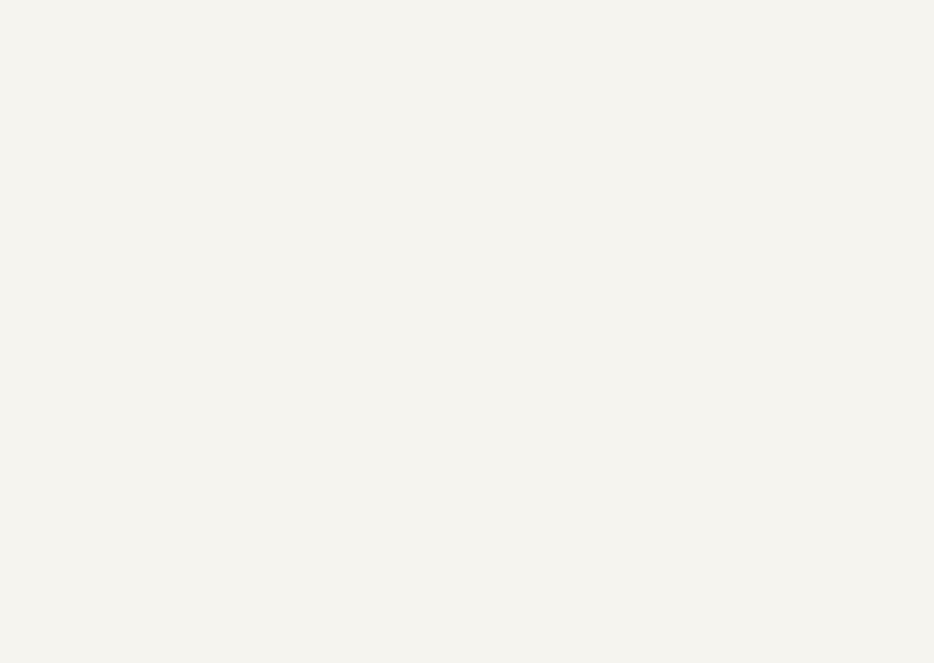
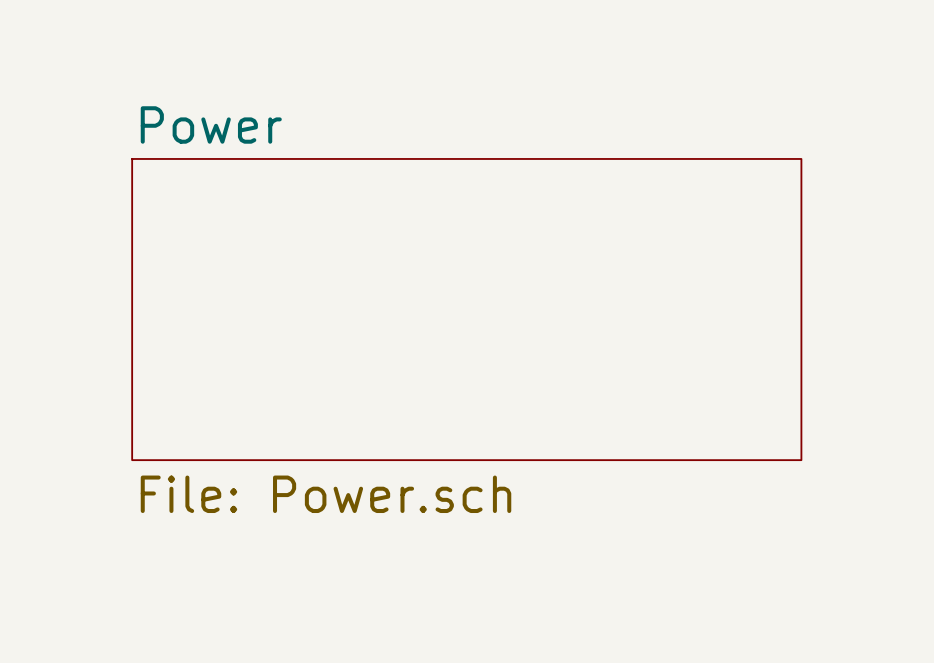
sheet Power: none -> File: Power.sch (466, 309)

